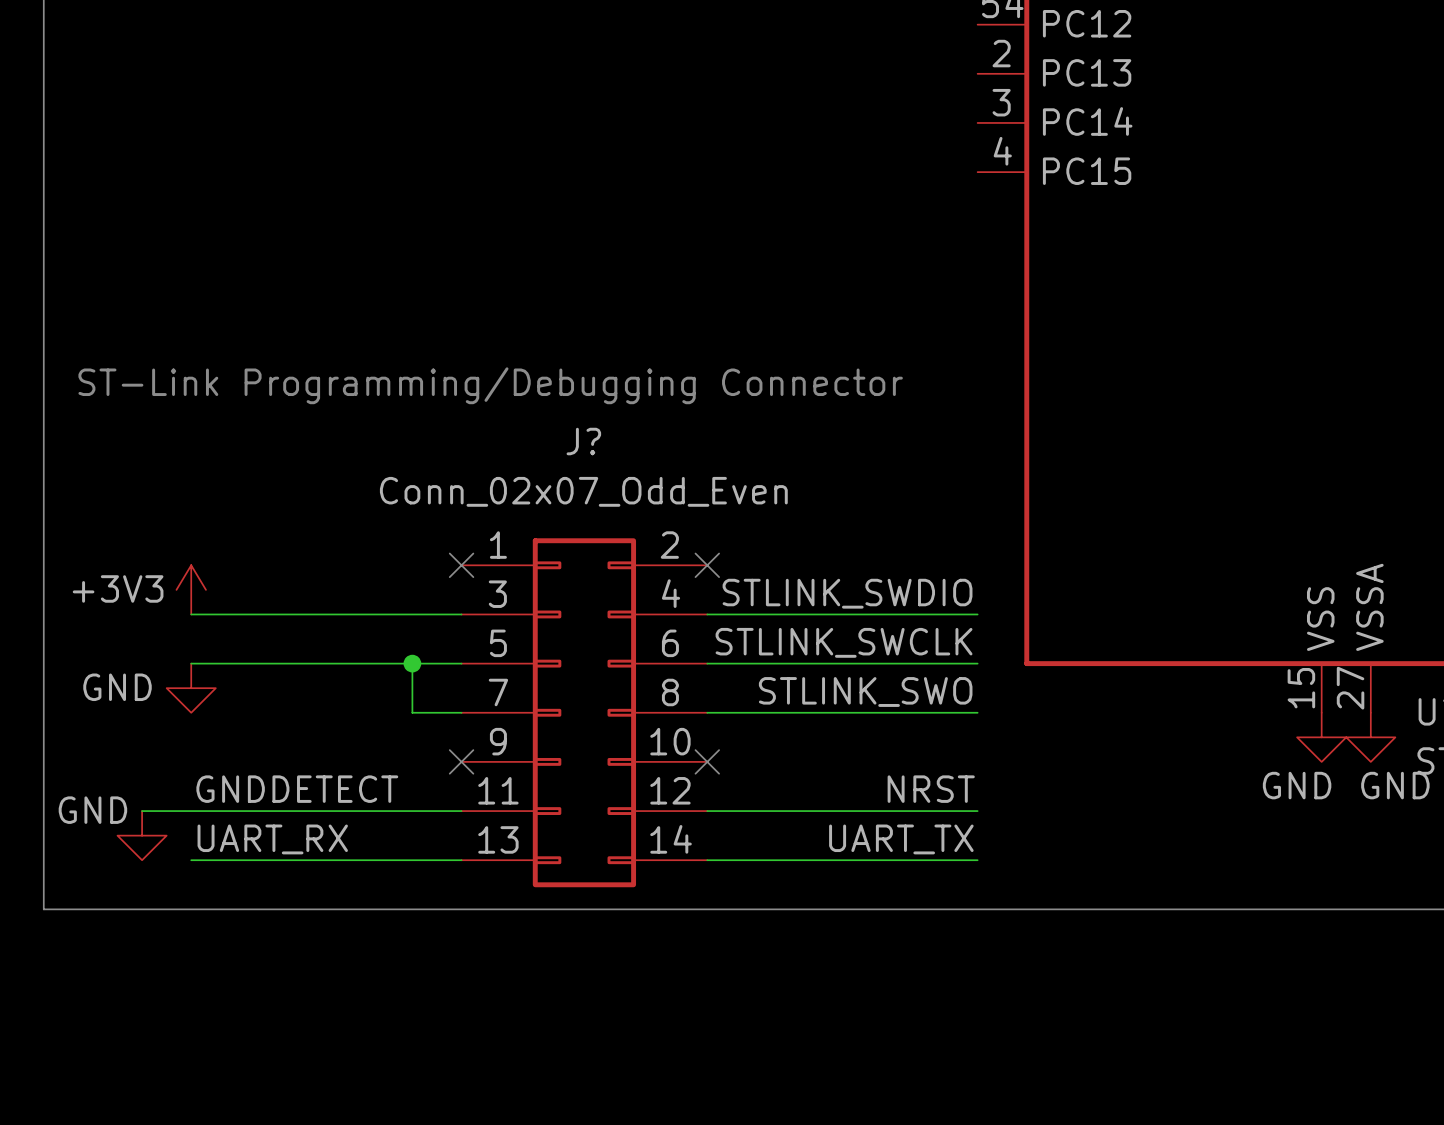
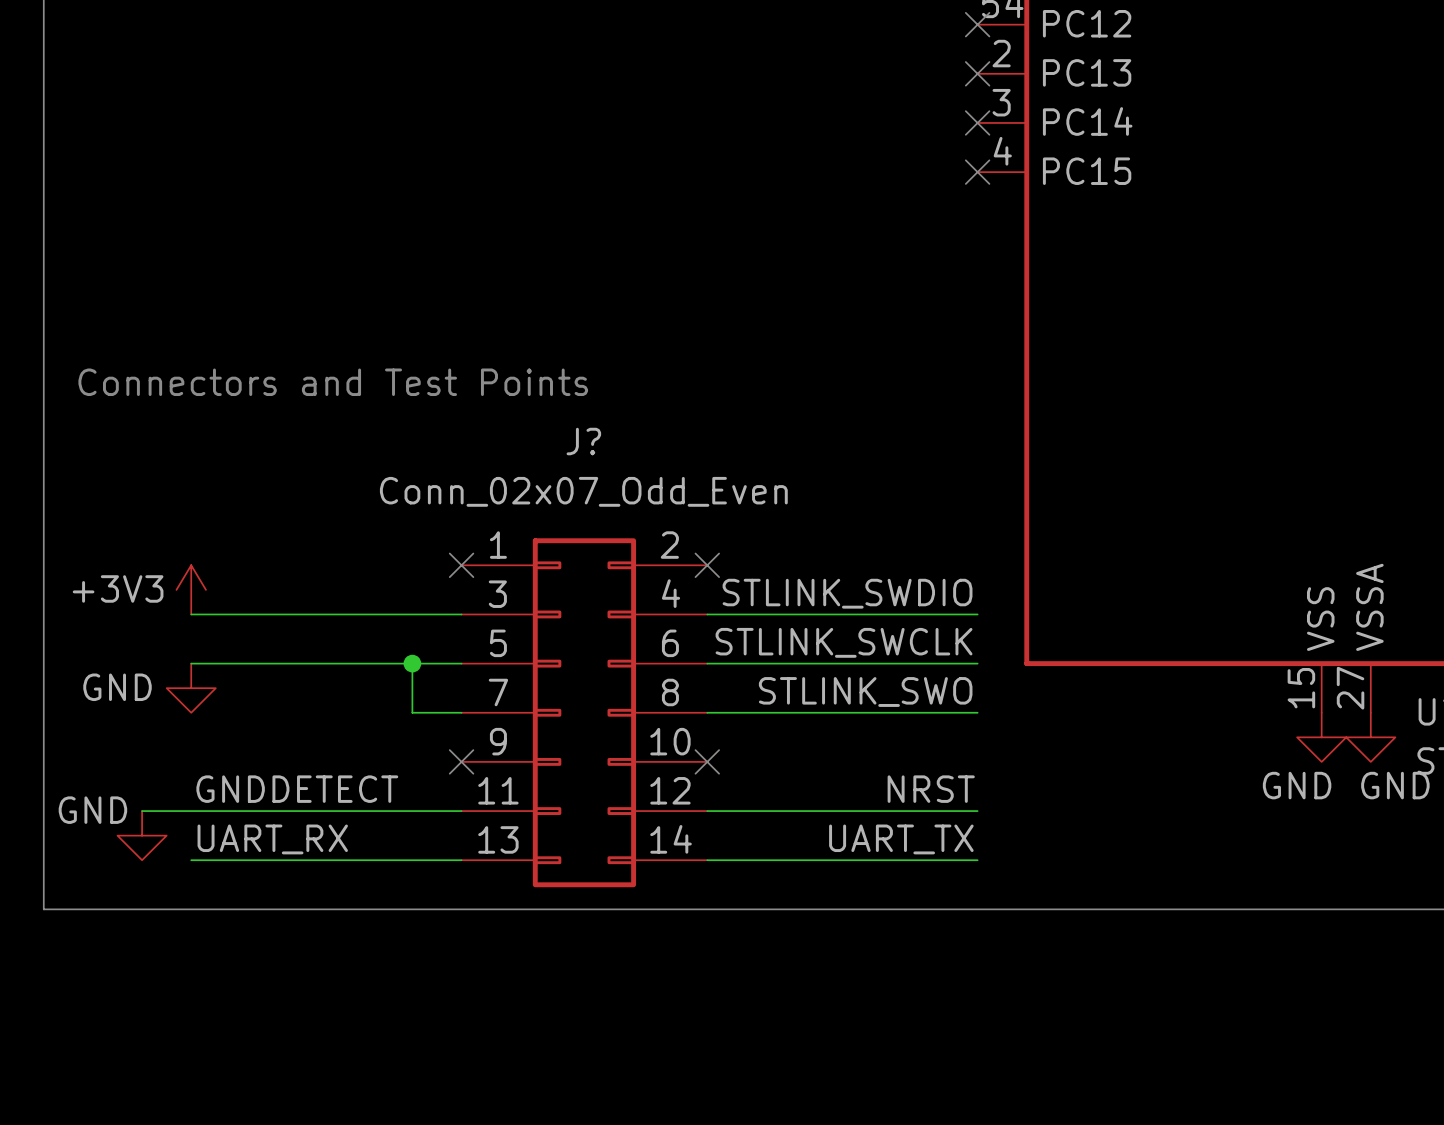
no-connect mark: none -> (977, 24)
no-connect mark: none -> (977, 73)
no-connect mark: none -> (977, 122)
no-connect mark: none -> (977, 172)
text: ST-Link Programming/Debugging Connector (490, 385) -> Connectors and Test Points (333, 382)

